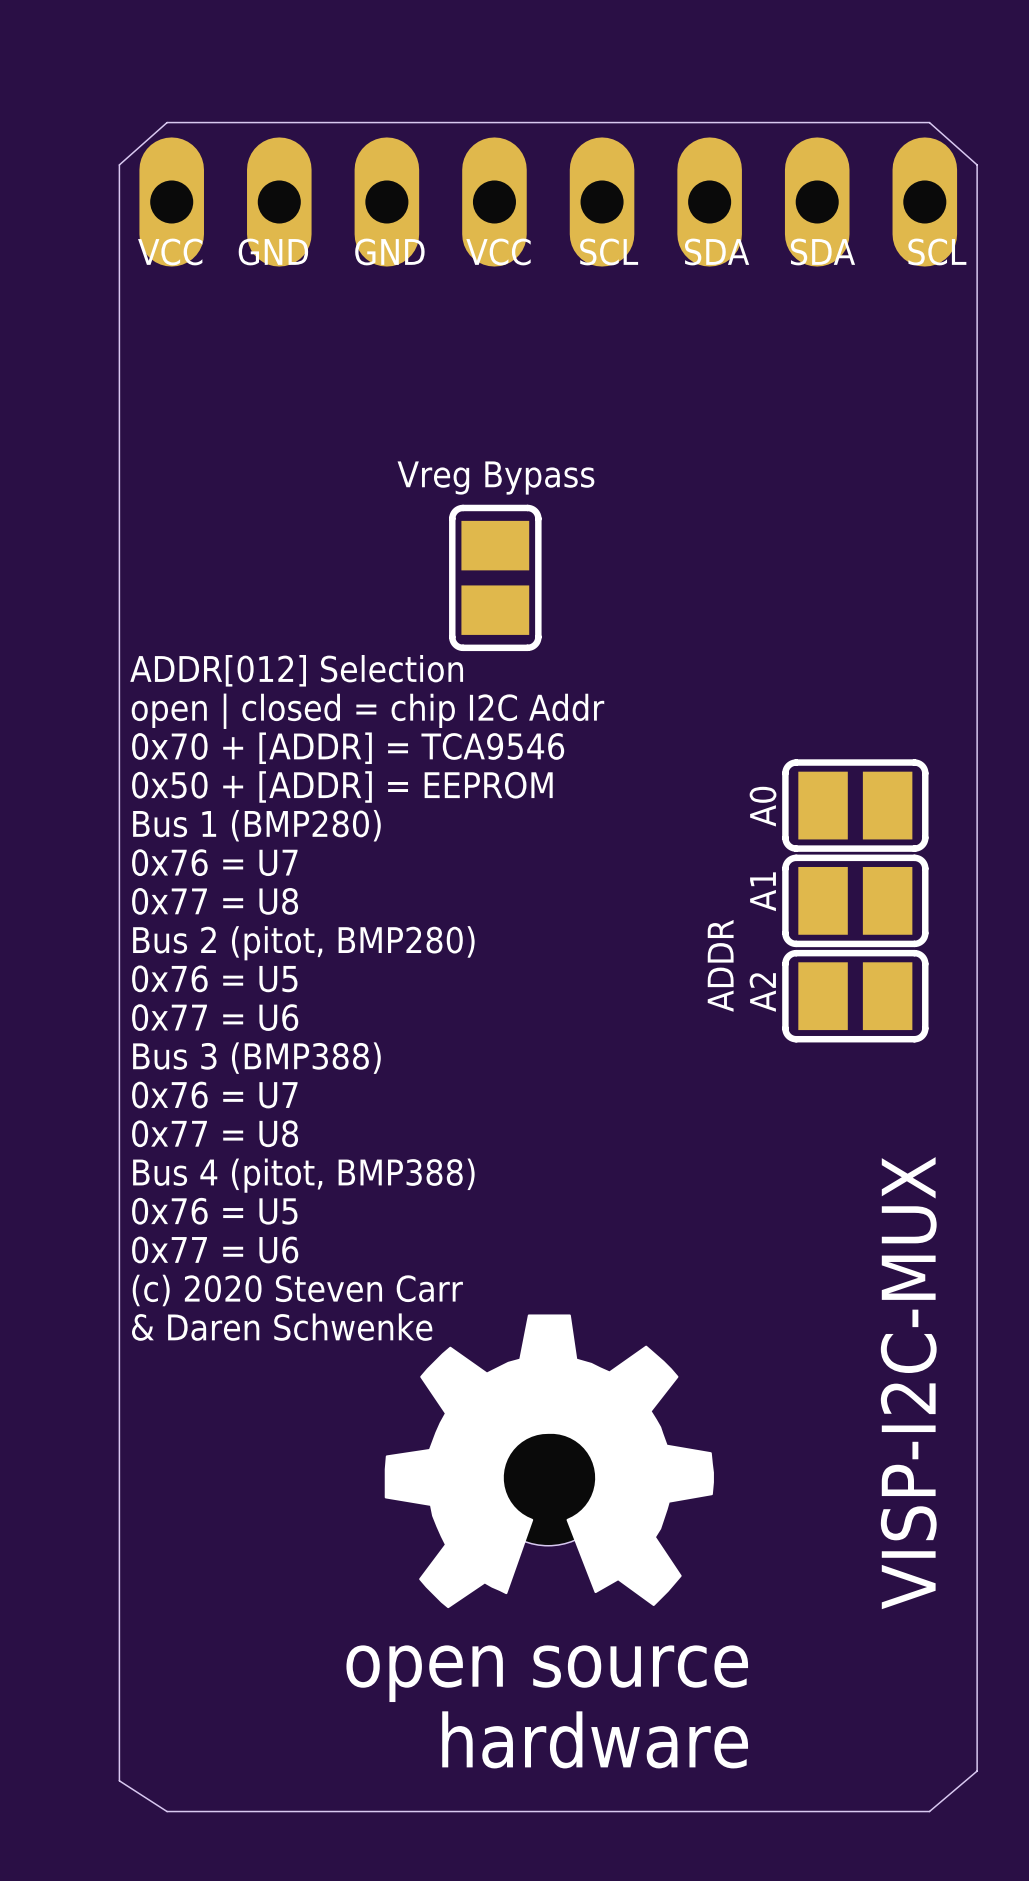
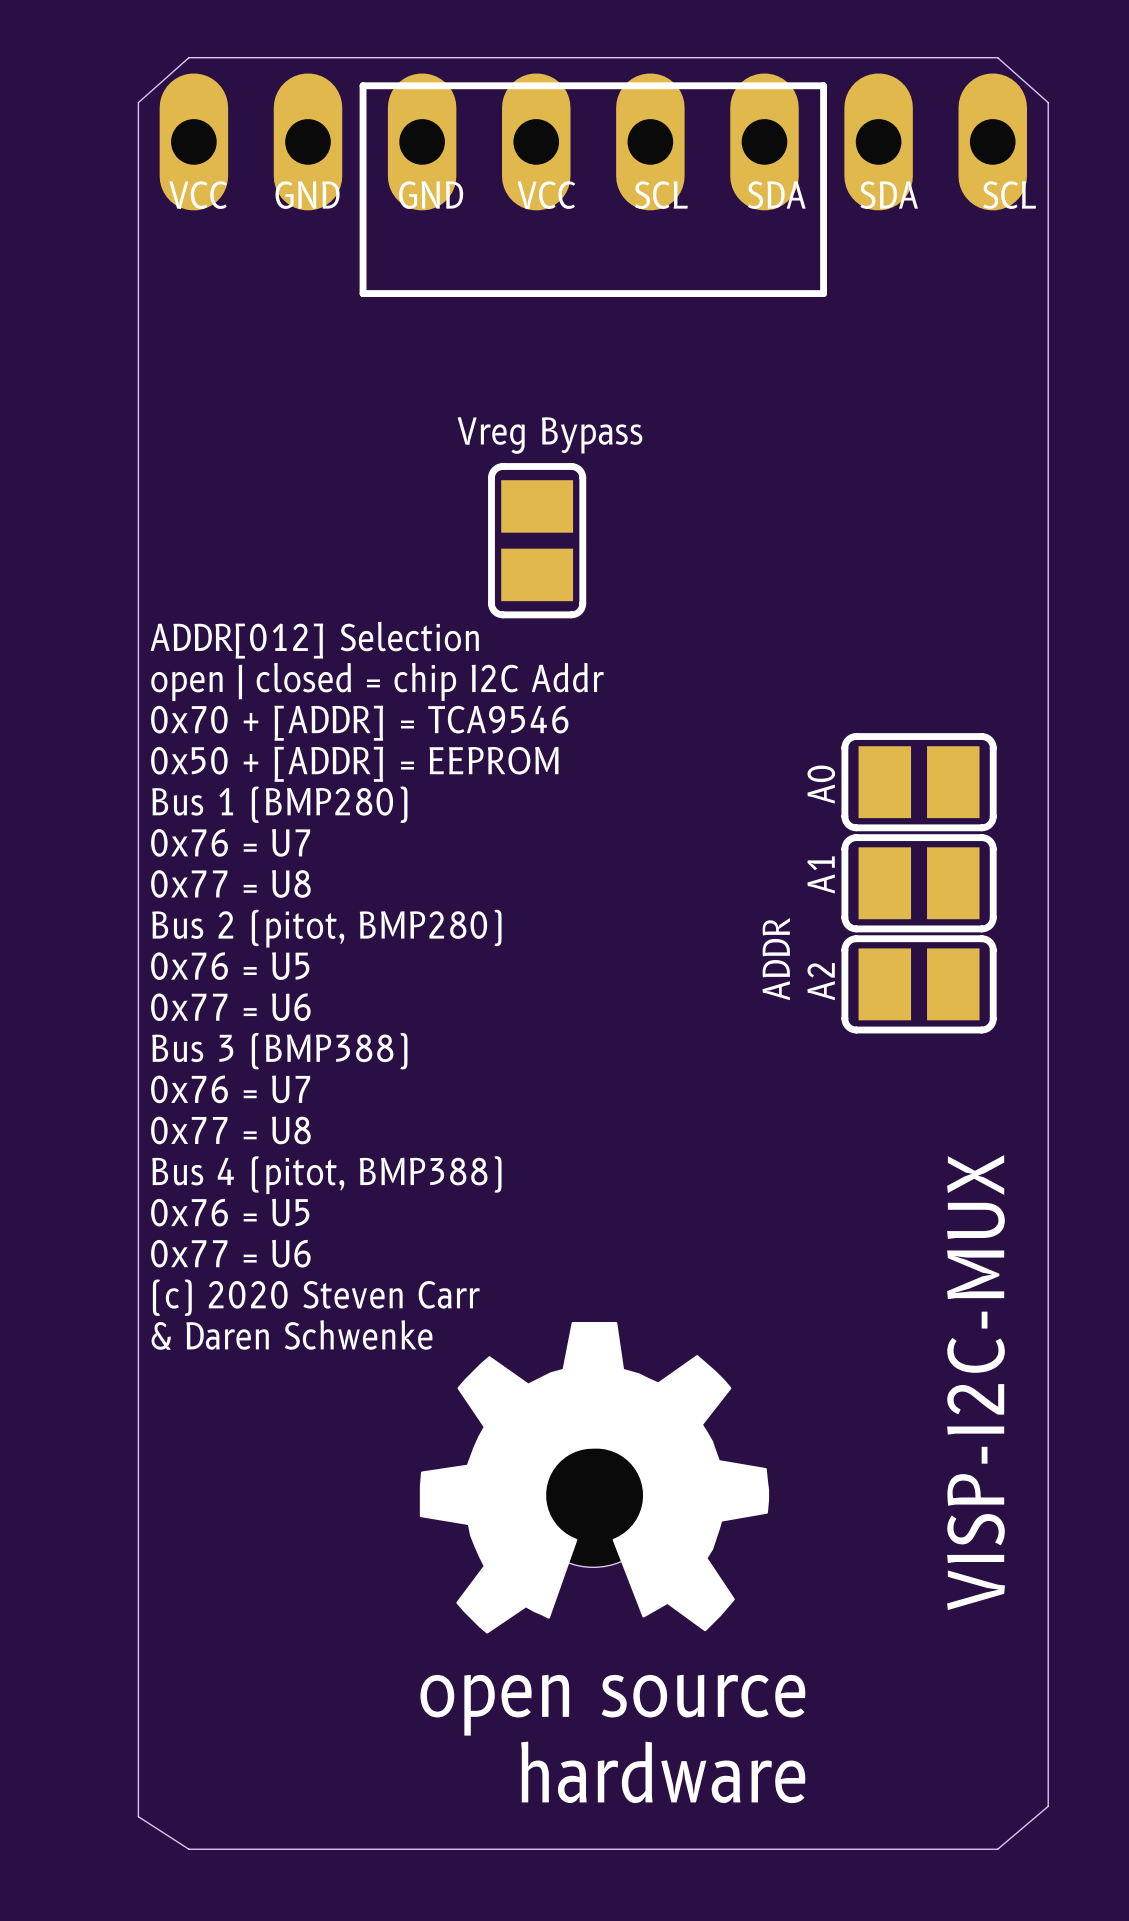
line: none -> (823, 85) (363, 85) (363, 293) (823, 293) (823, 85)

